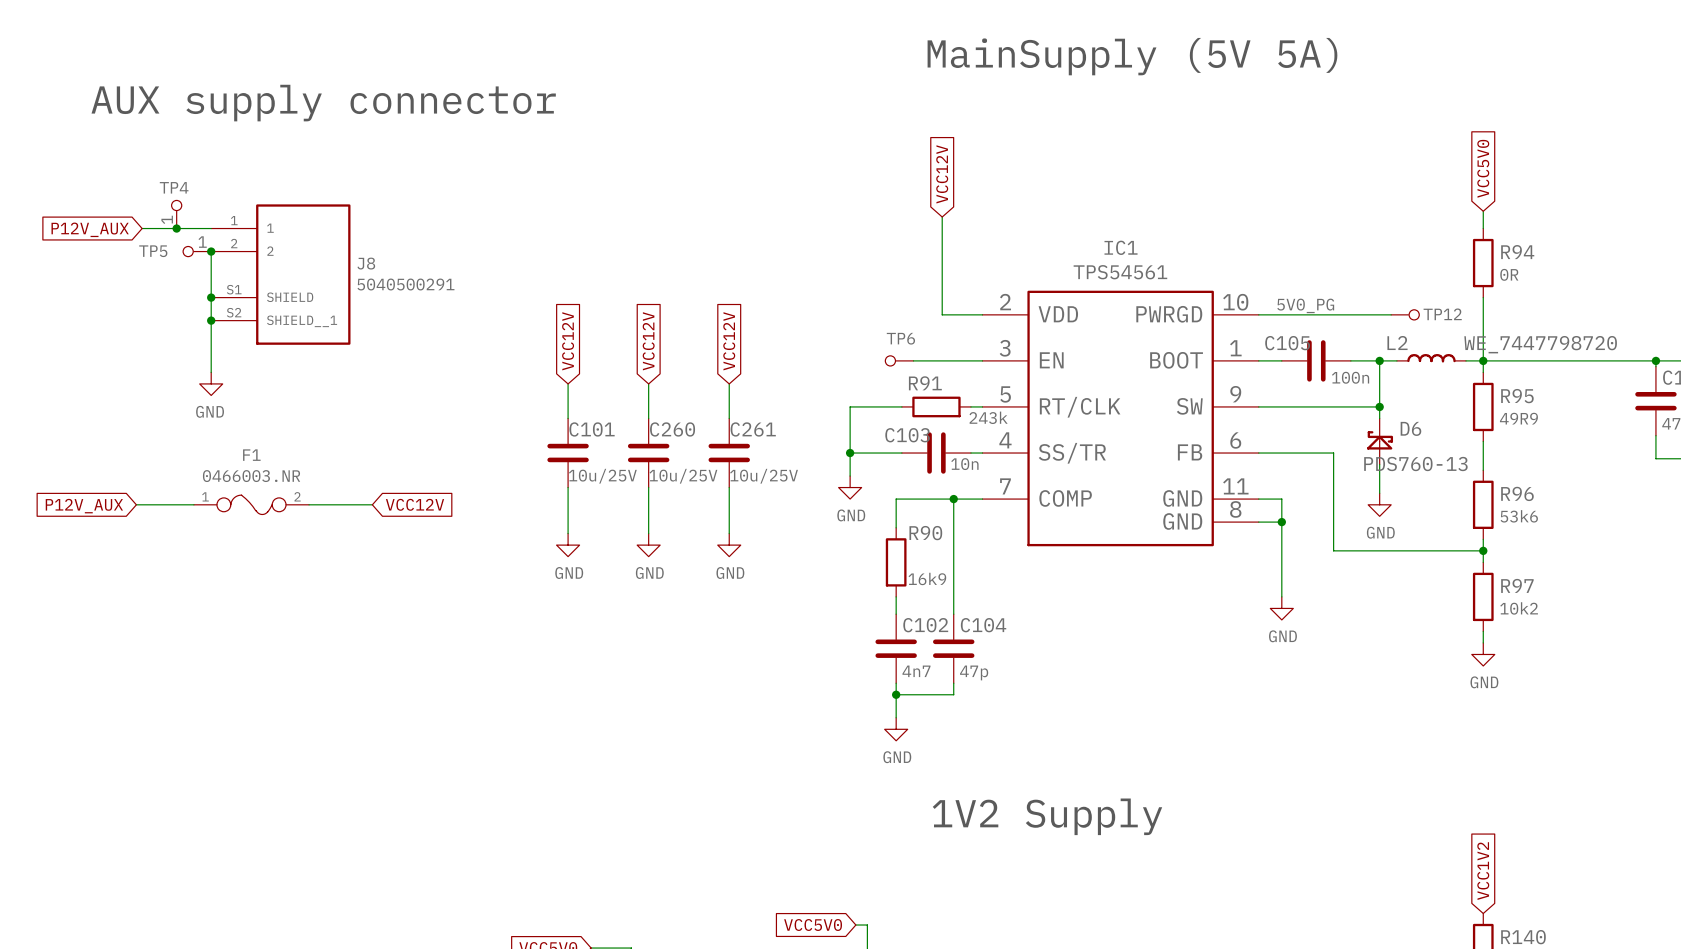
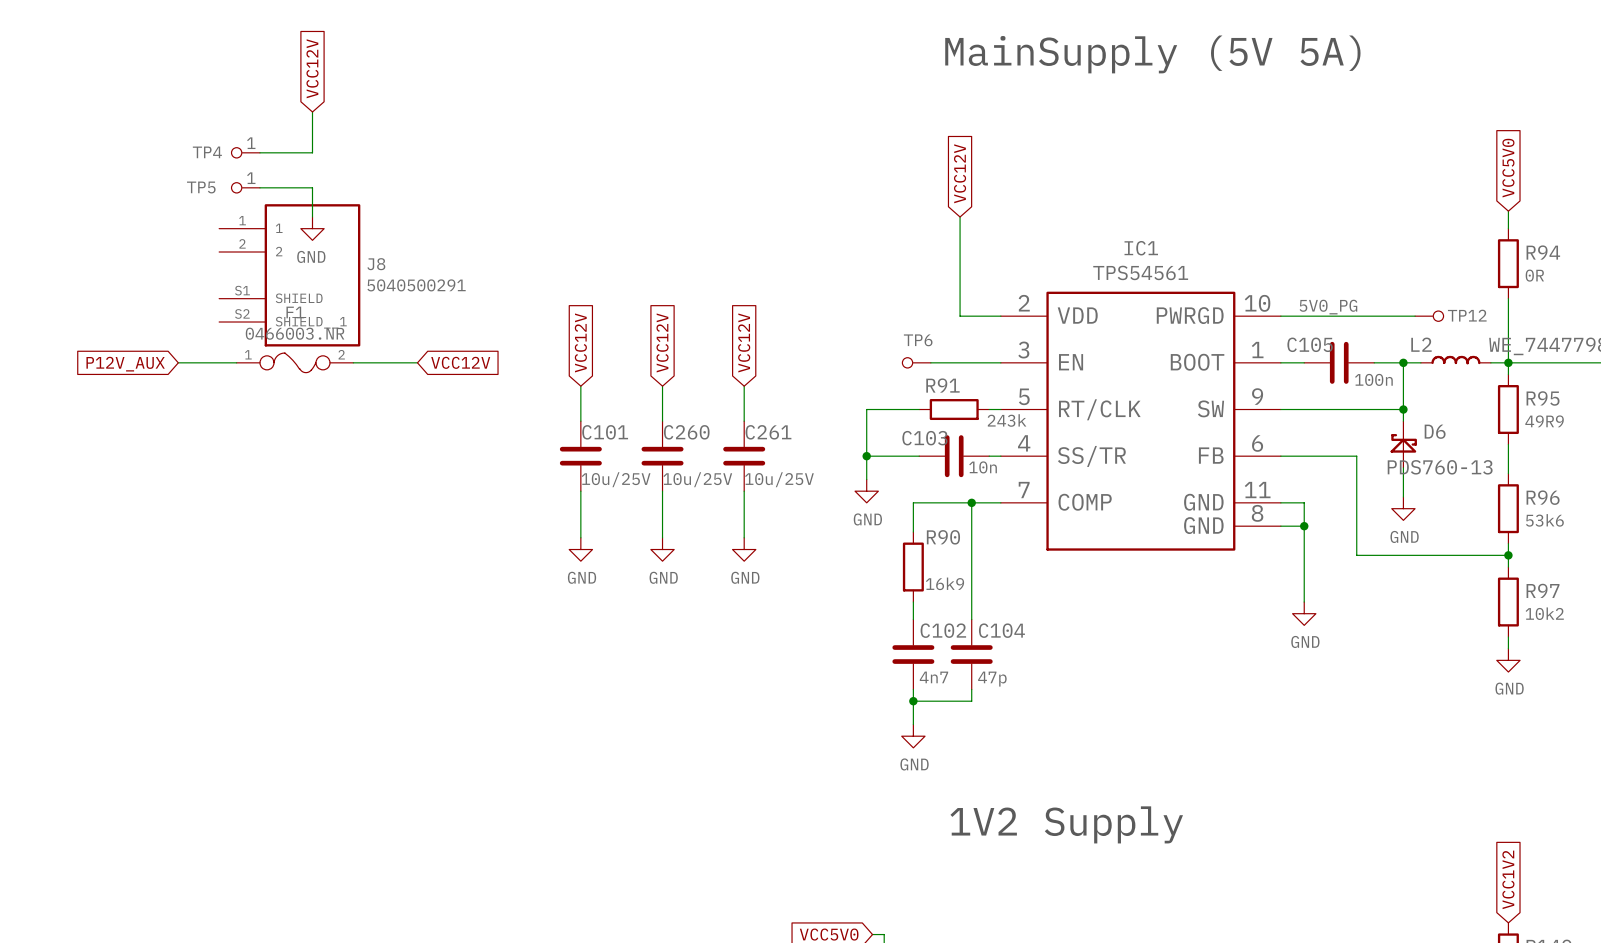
global label: none -> VCC12V (312, 68)
text: AUX supply connector (323, 103) -> none
wire: none -> (312, 111) (312, 152) (259, 152)
wire: none -> (259, 187) (312, 187) (312, 216)
TP4 rotation: 0° (176, 205) -> 90° counterclockwise (236, 152)
TP4 position: (176, 214) -> (245, 152)
wire: (142, 228) (211, 228) -> none
junction: (176, 228) -> none
global label: P12V_AUX (90, 229) -> none
TP5 position: (197, 251) -> (245, 187)
wire: (211, 251) (211, 372) -> none
junction: (211, 251) -> none
junction: (211, 297) -> none
junction: (211, 320) -> none
global label: none -> P12V_AUX (125, 364)
power symbol position: GND (211, 383) -> GND (312, 228)
wire: (136, 504) (193, 504) -> (178, 362) (236, 362)
F1 position: (251, 504) -> (294, 362)
wire: (309, 504) (372, 504) -> (353, 362) (417, 362)
global label position: VCC12V (415, 504) -> VCC12V (460, 362)
global label: P12V_AUX (84, 506) -> none

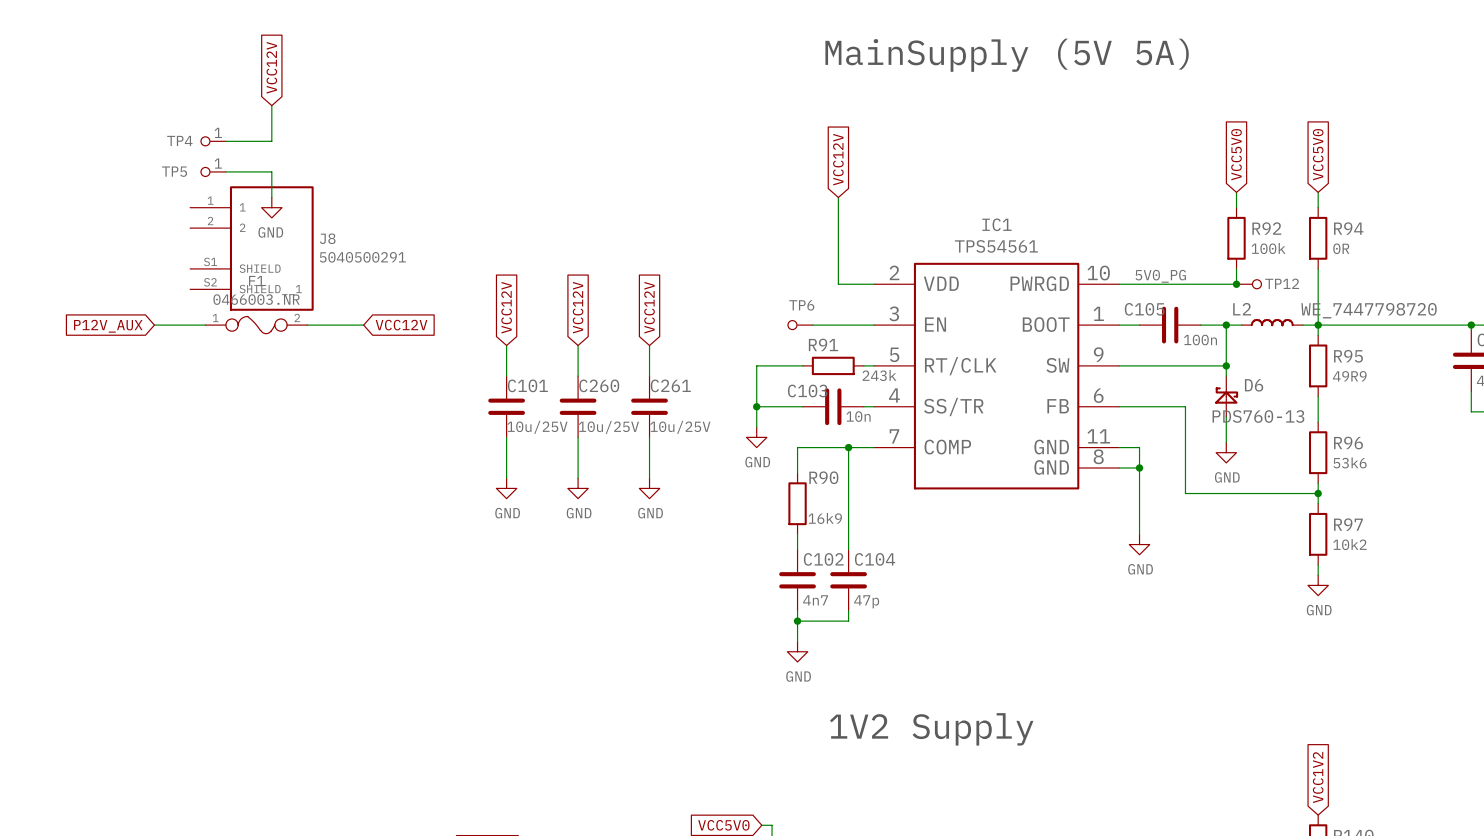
global label: none -> VCC5V0 (1236, 154)
wire: none -> (1236, 192) (1236, 207)
R92: none -> (1236, 238)
wire: none -> (1236, 268) (1236, 284)
junction: none -> (1236, 284)

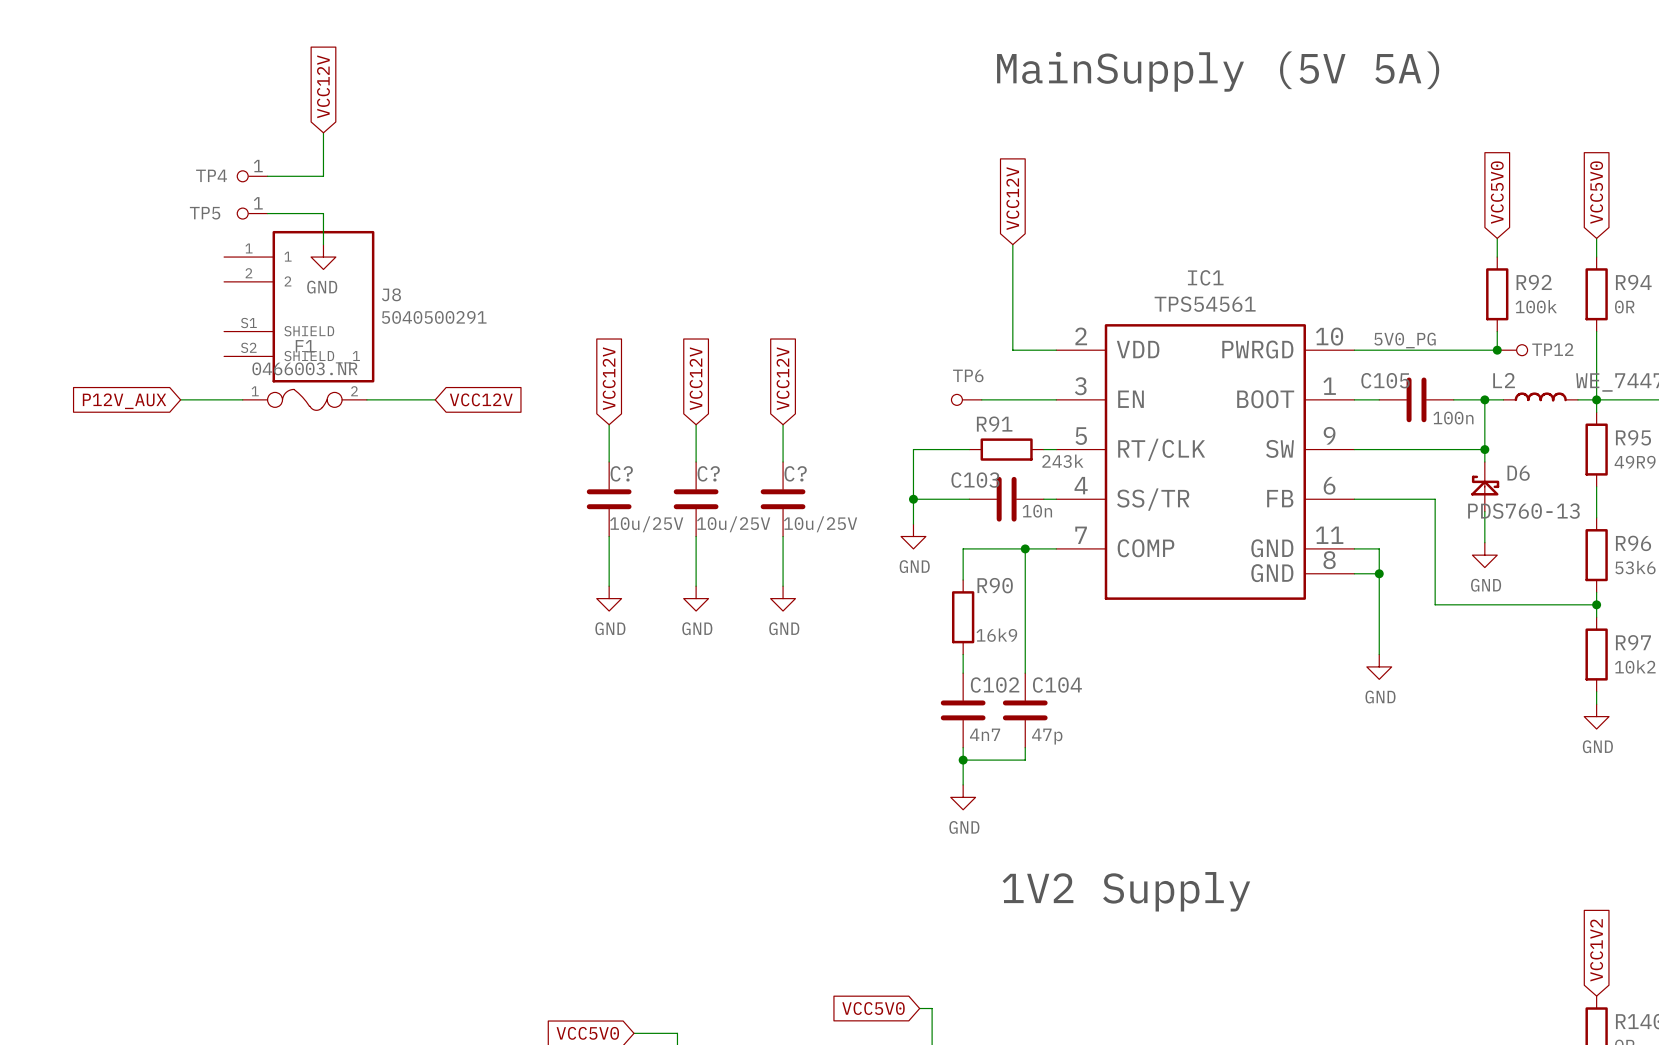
C101 name: C101 (527, 385) -> C? (621, 473)
C260 name: C260 (599, 385) -> C? (708, 473)
C261 name: C261 (670, 385) -> C? (795, 473)

